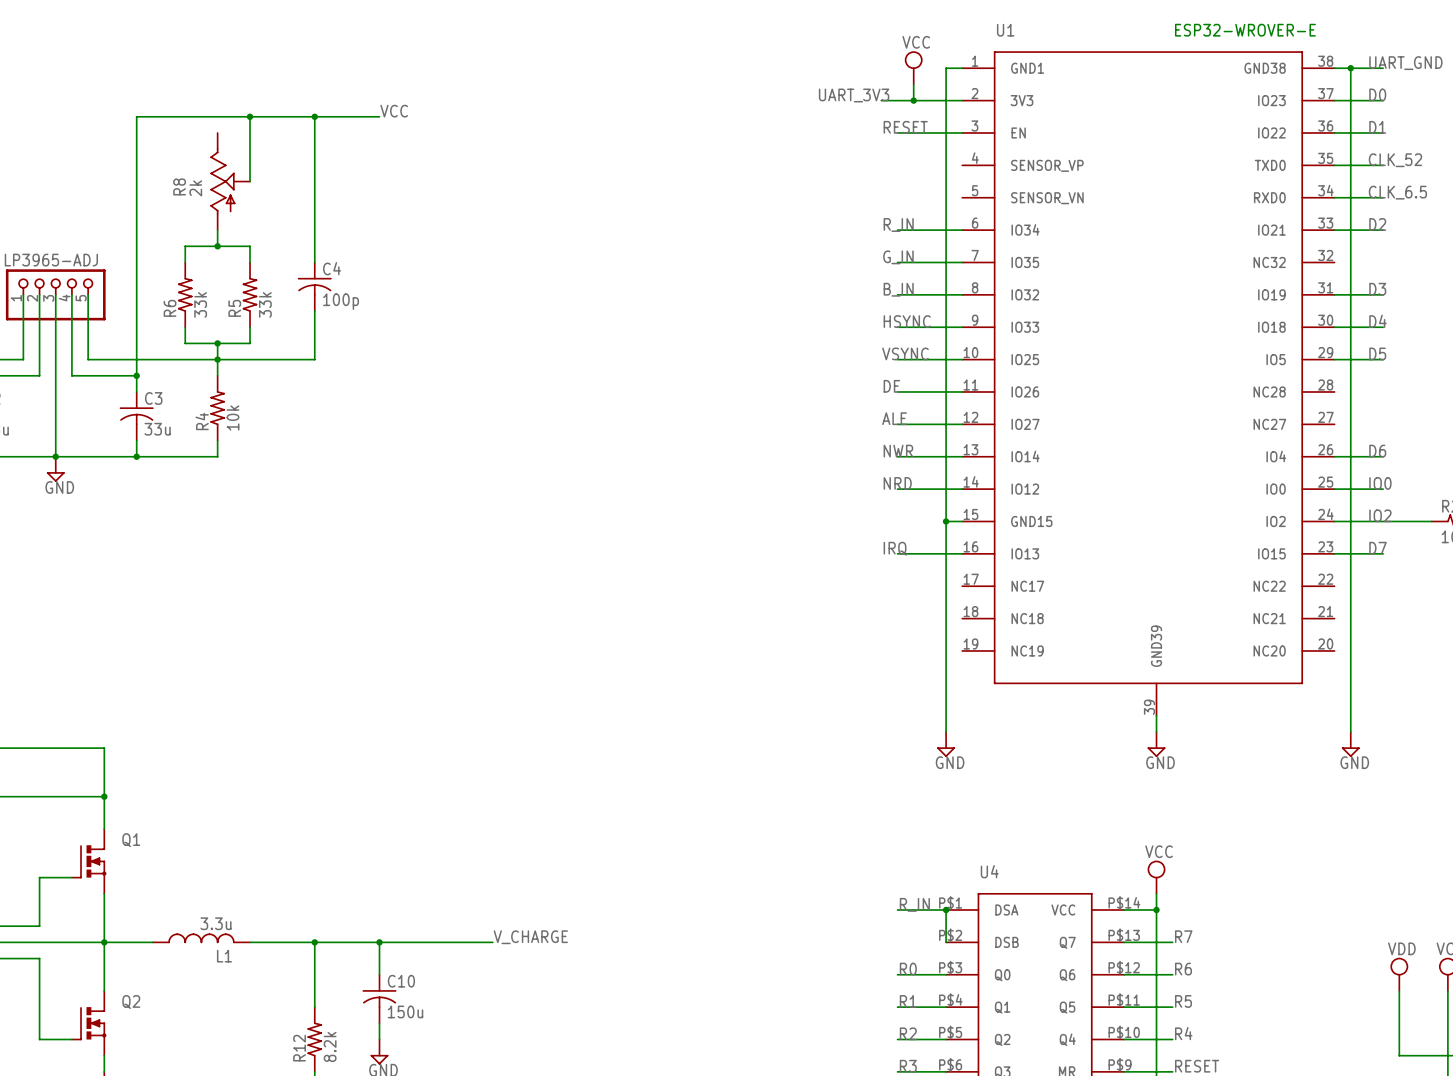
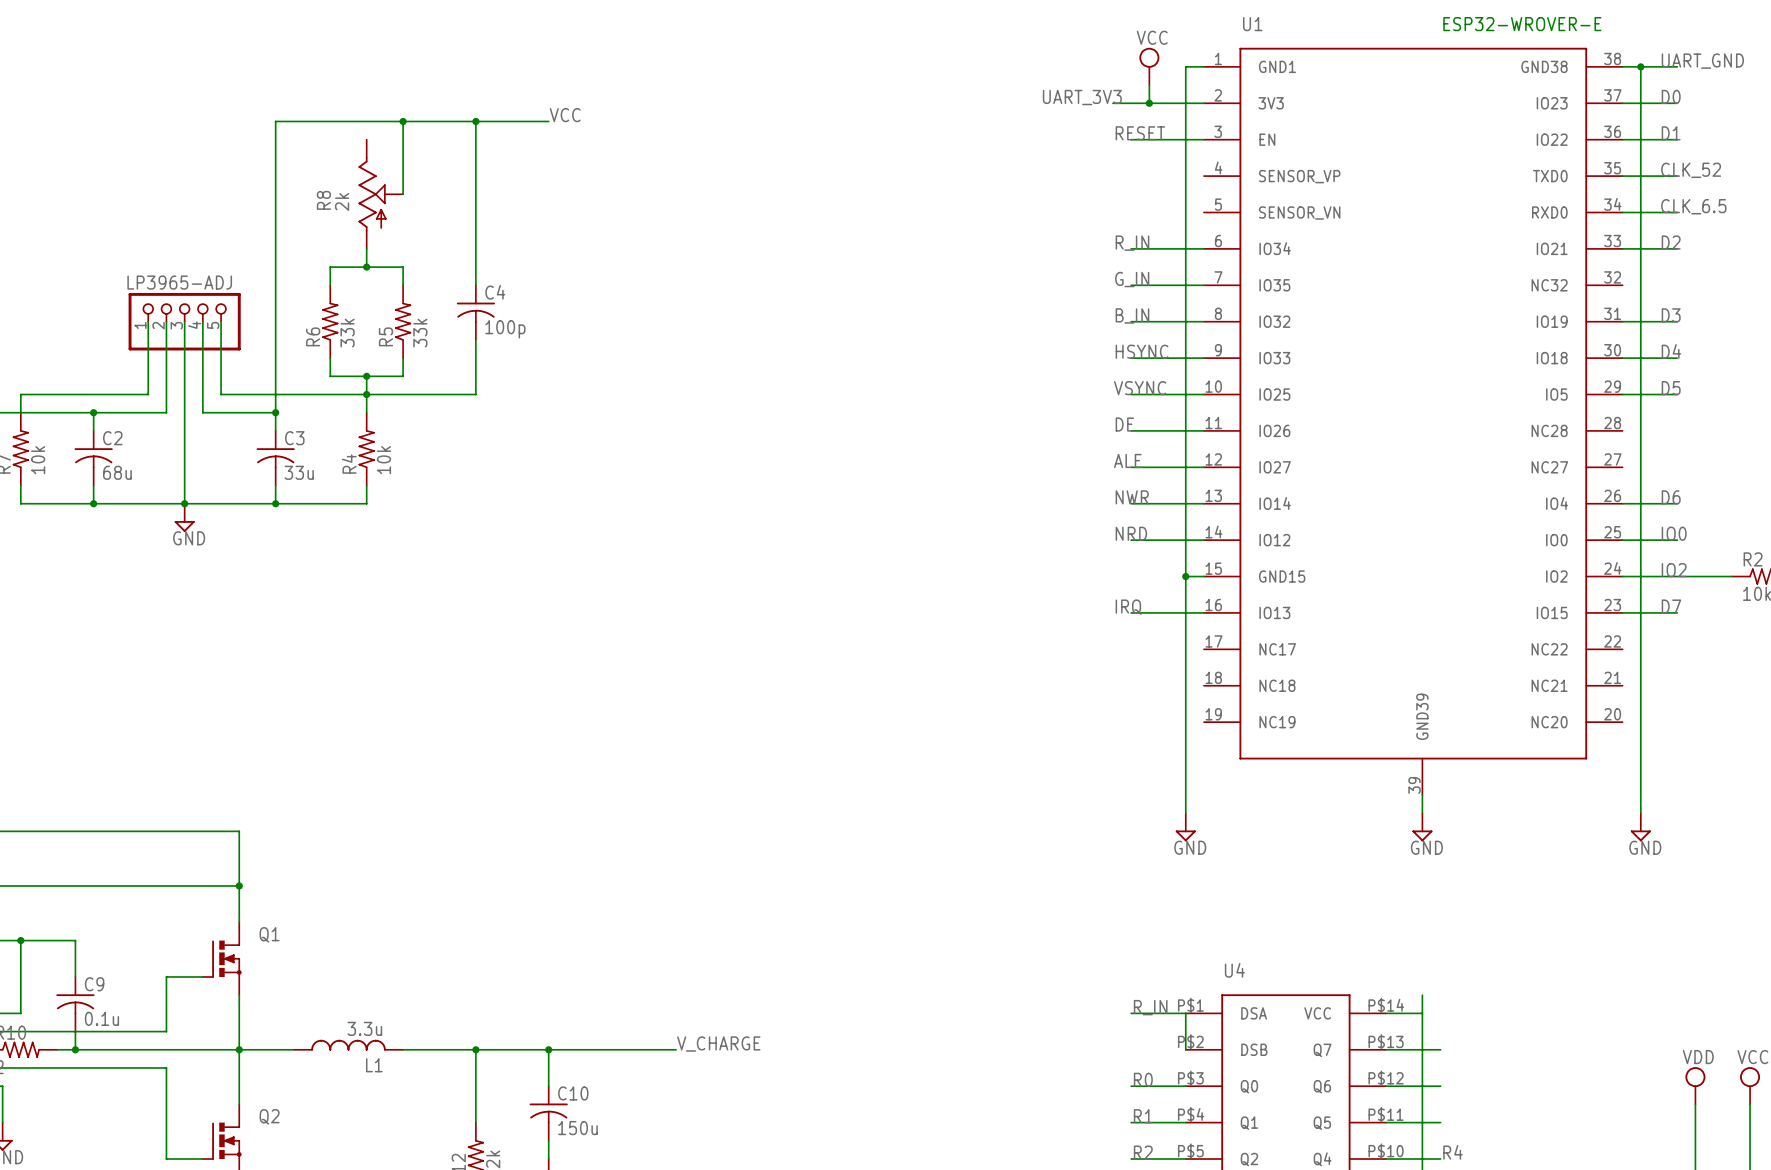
power symbol: VCC (1156, 877) -> none
junction: (946, 909) -> none
junction: (1156, 909) -> none
label: R7 (1183, 936) -> none
label: R6 (1183, 969) -> none
label: R5 (1183, 1001) -> none

